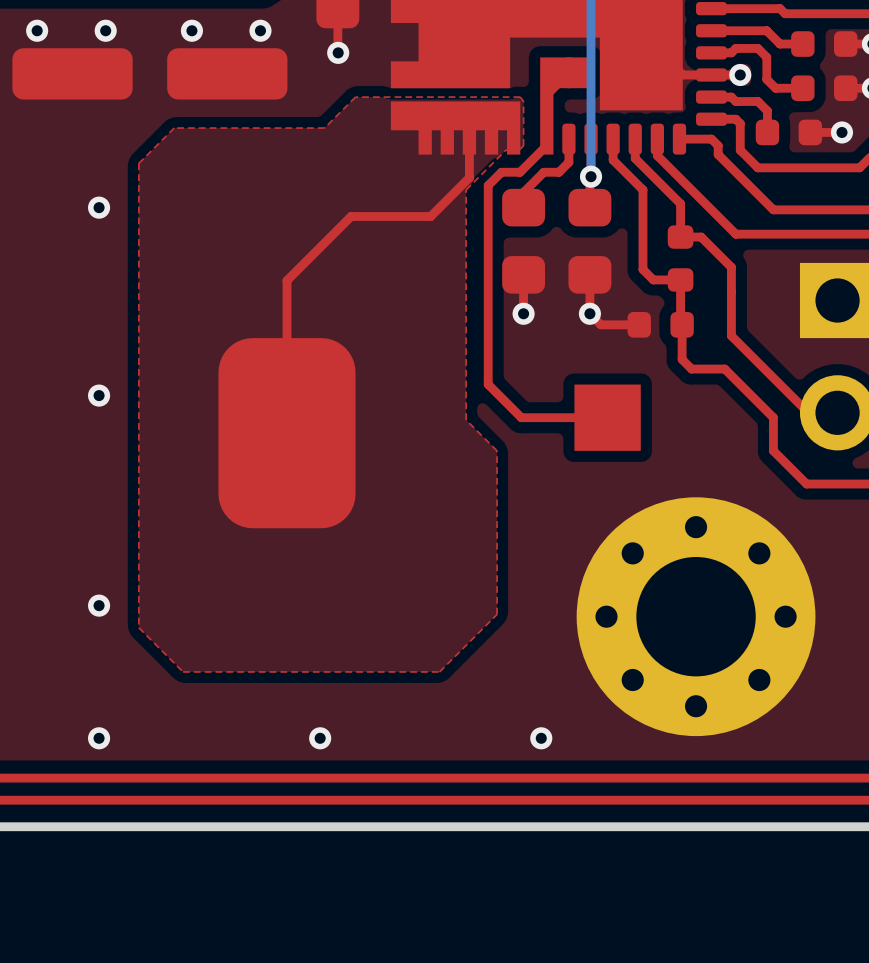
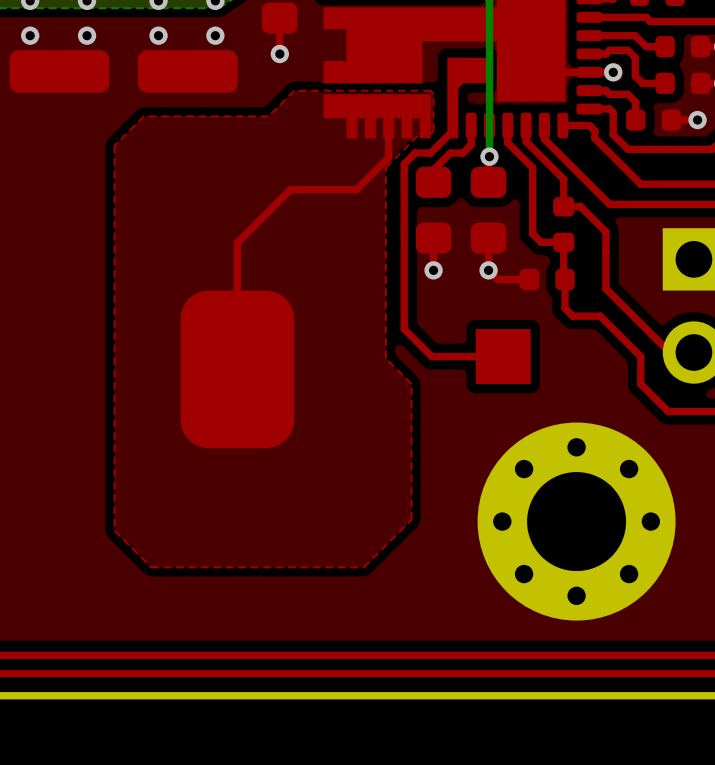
via: (99, 207) -> none
via: (99, 395) -> none
via: (99, 605) -> none
via: (99, 738) -> none
via: (320, 738) -> none
via: (541, 738) -> none

